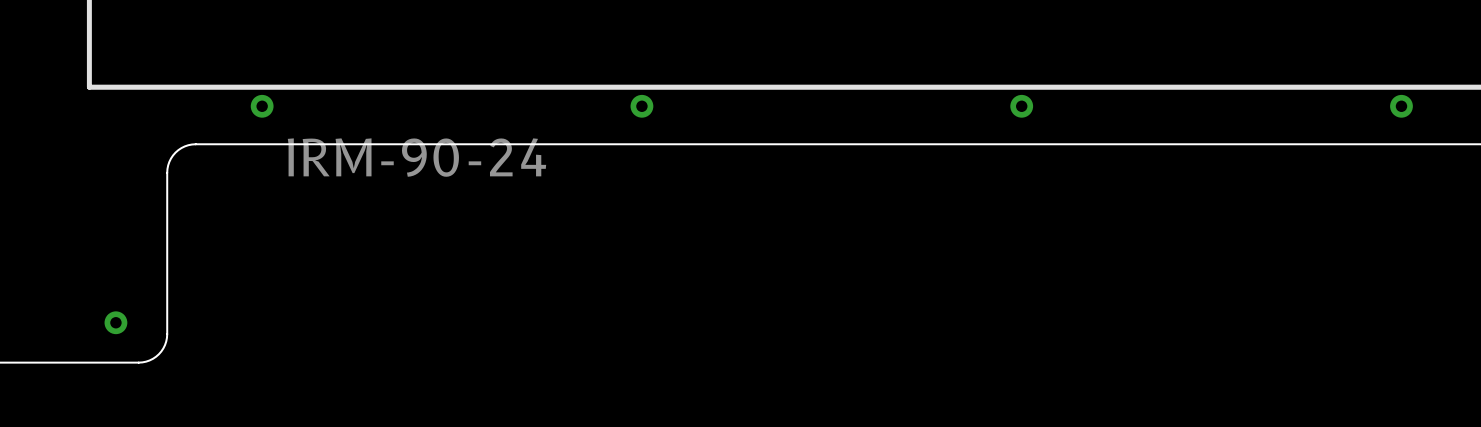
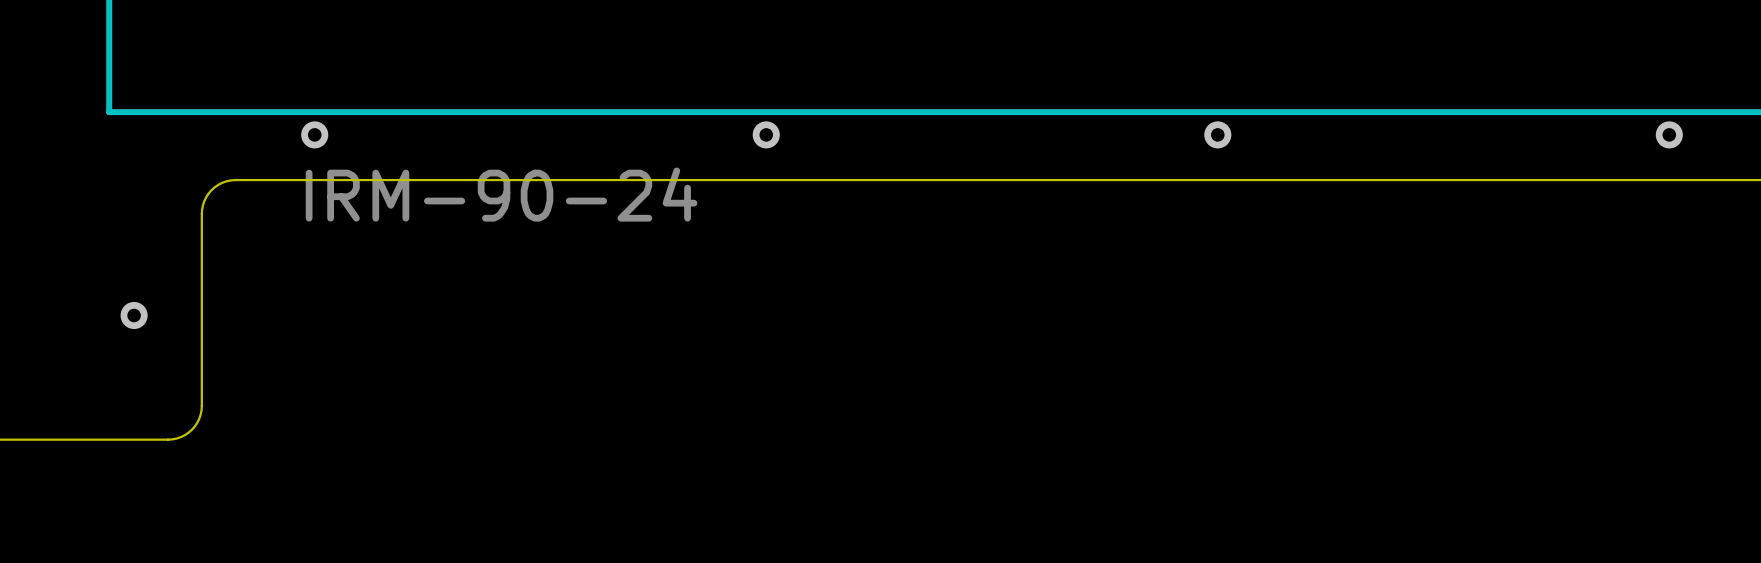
via position: (115, 322) -> (134, 315)

